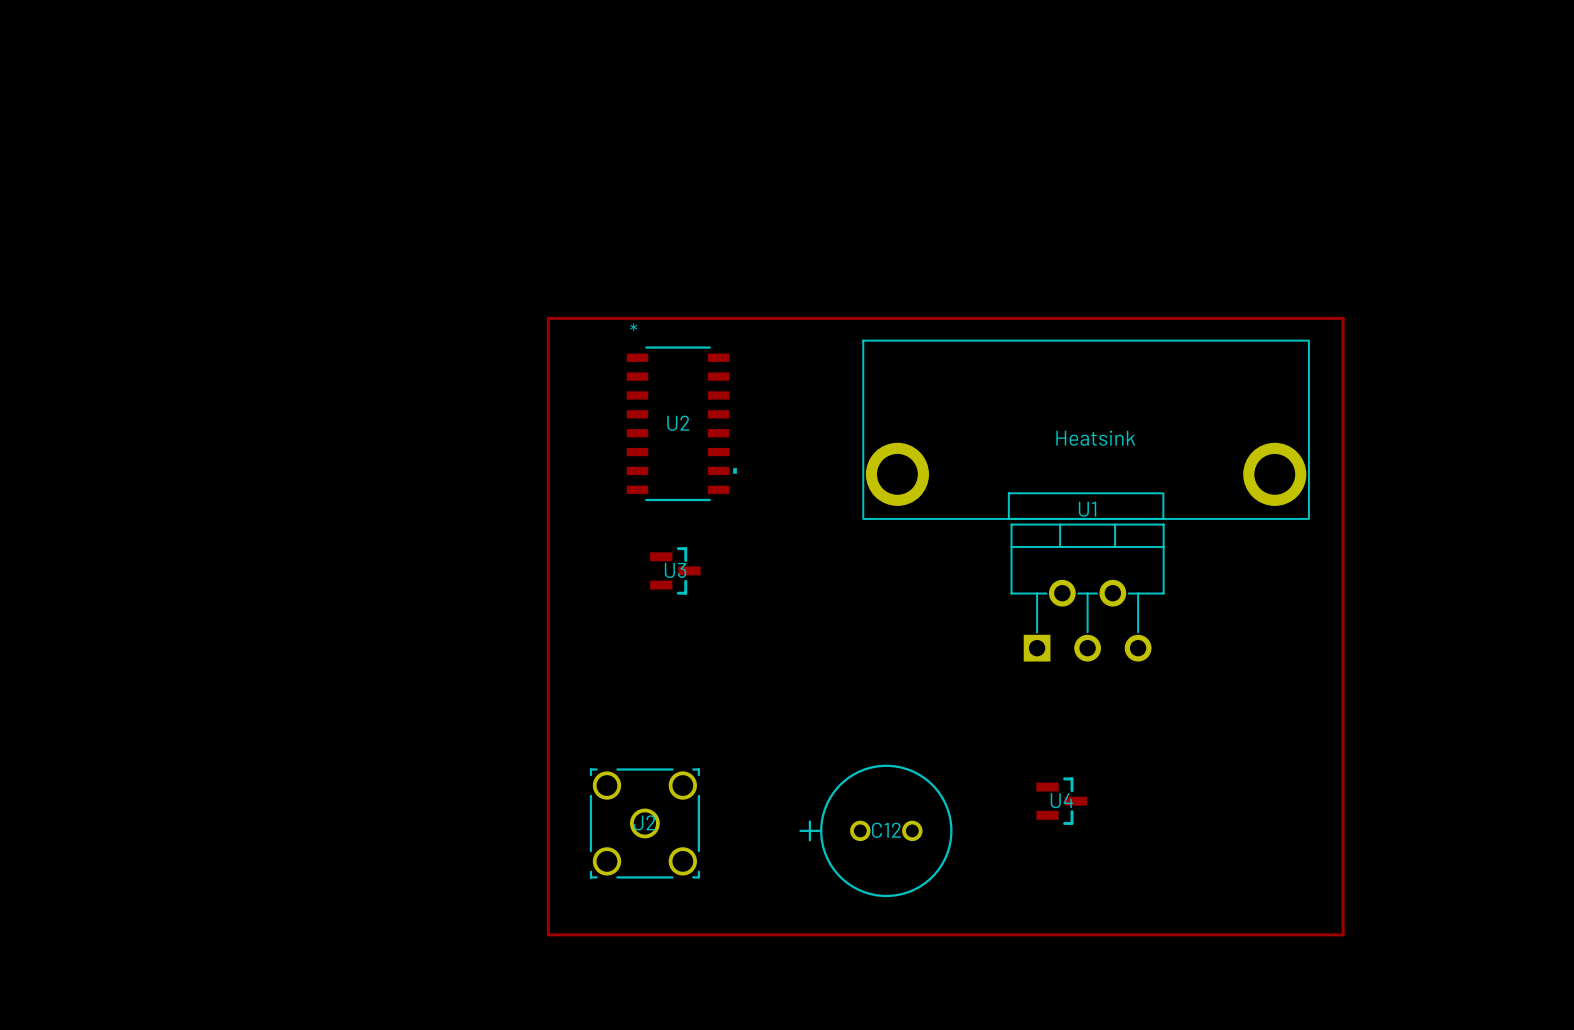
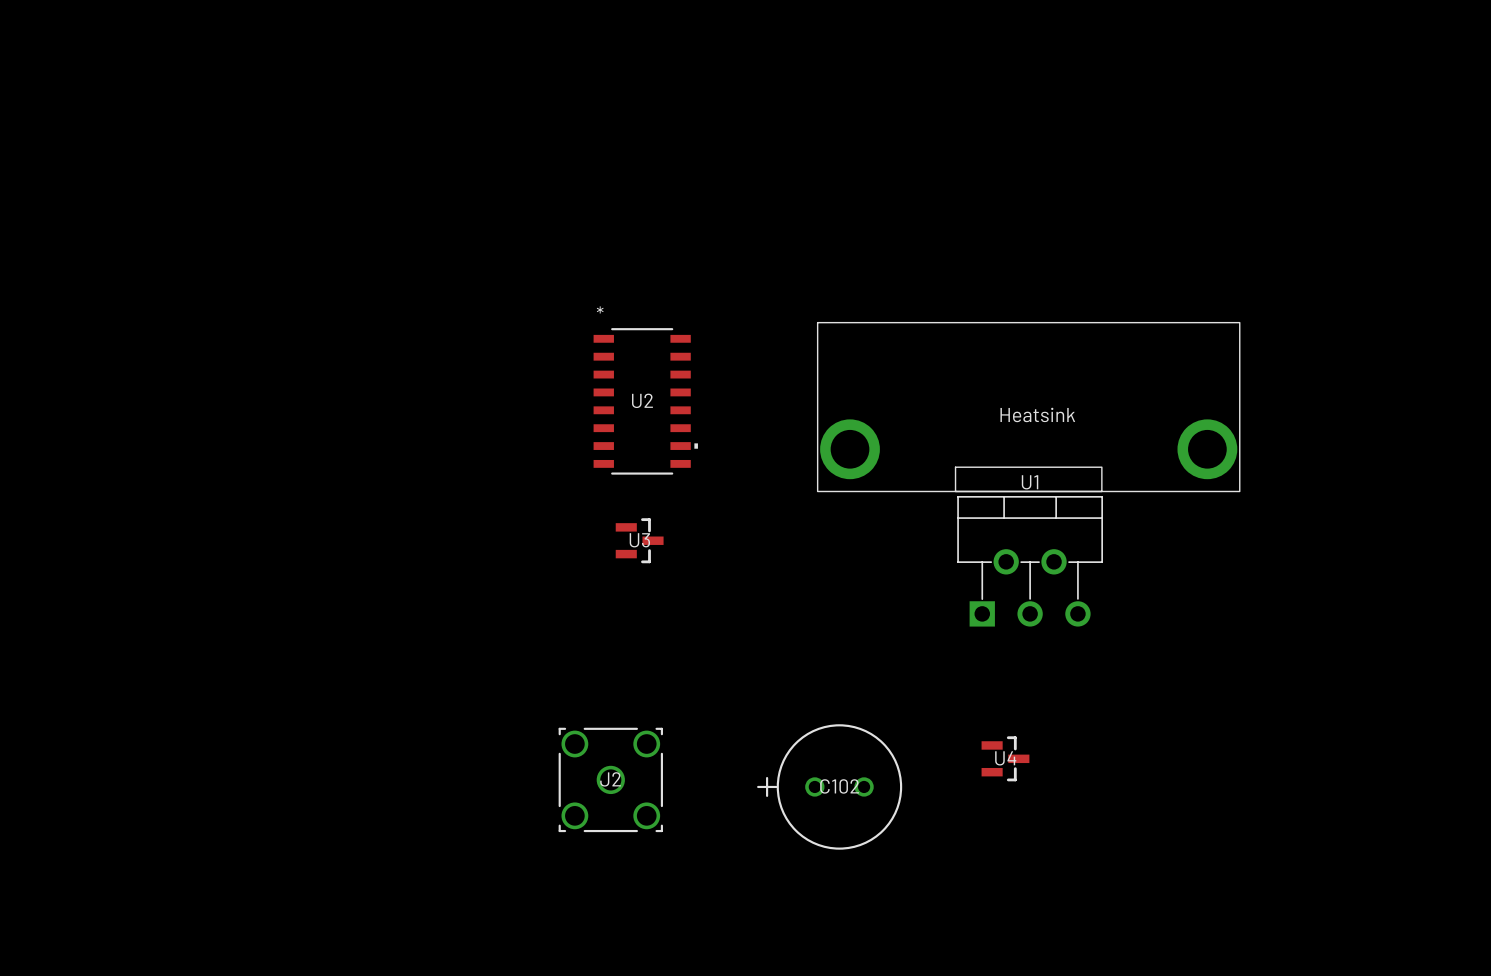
top track: (548, 318) (1343, 318) (1343, 934) (548, 934) (548, 318) -> none
C12 name: C12 (886, 830) -> C102 (839, 786)

